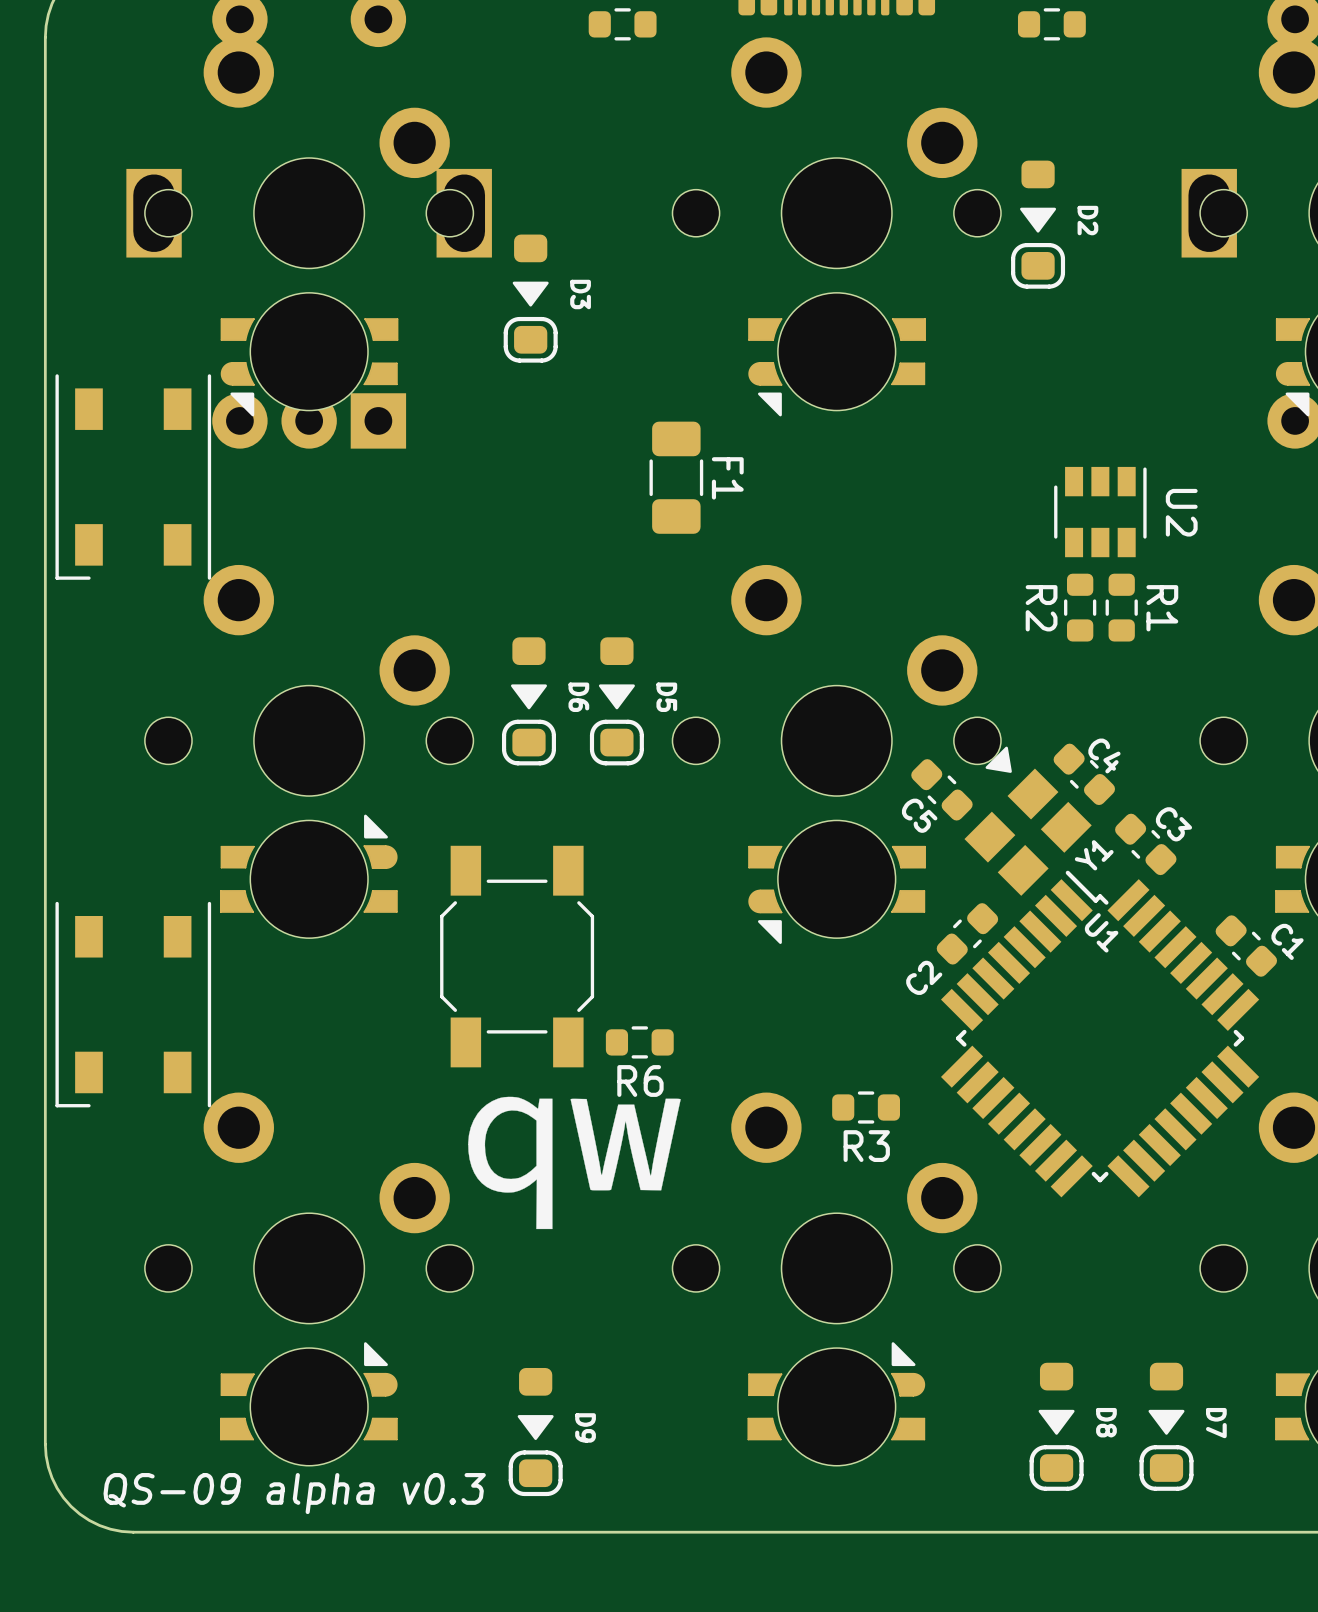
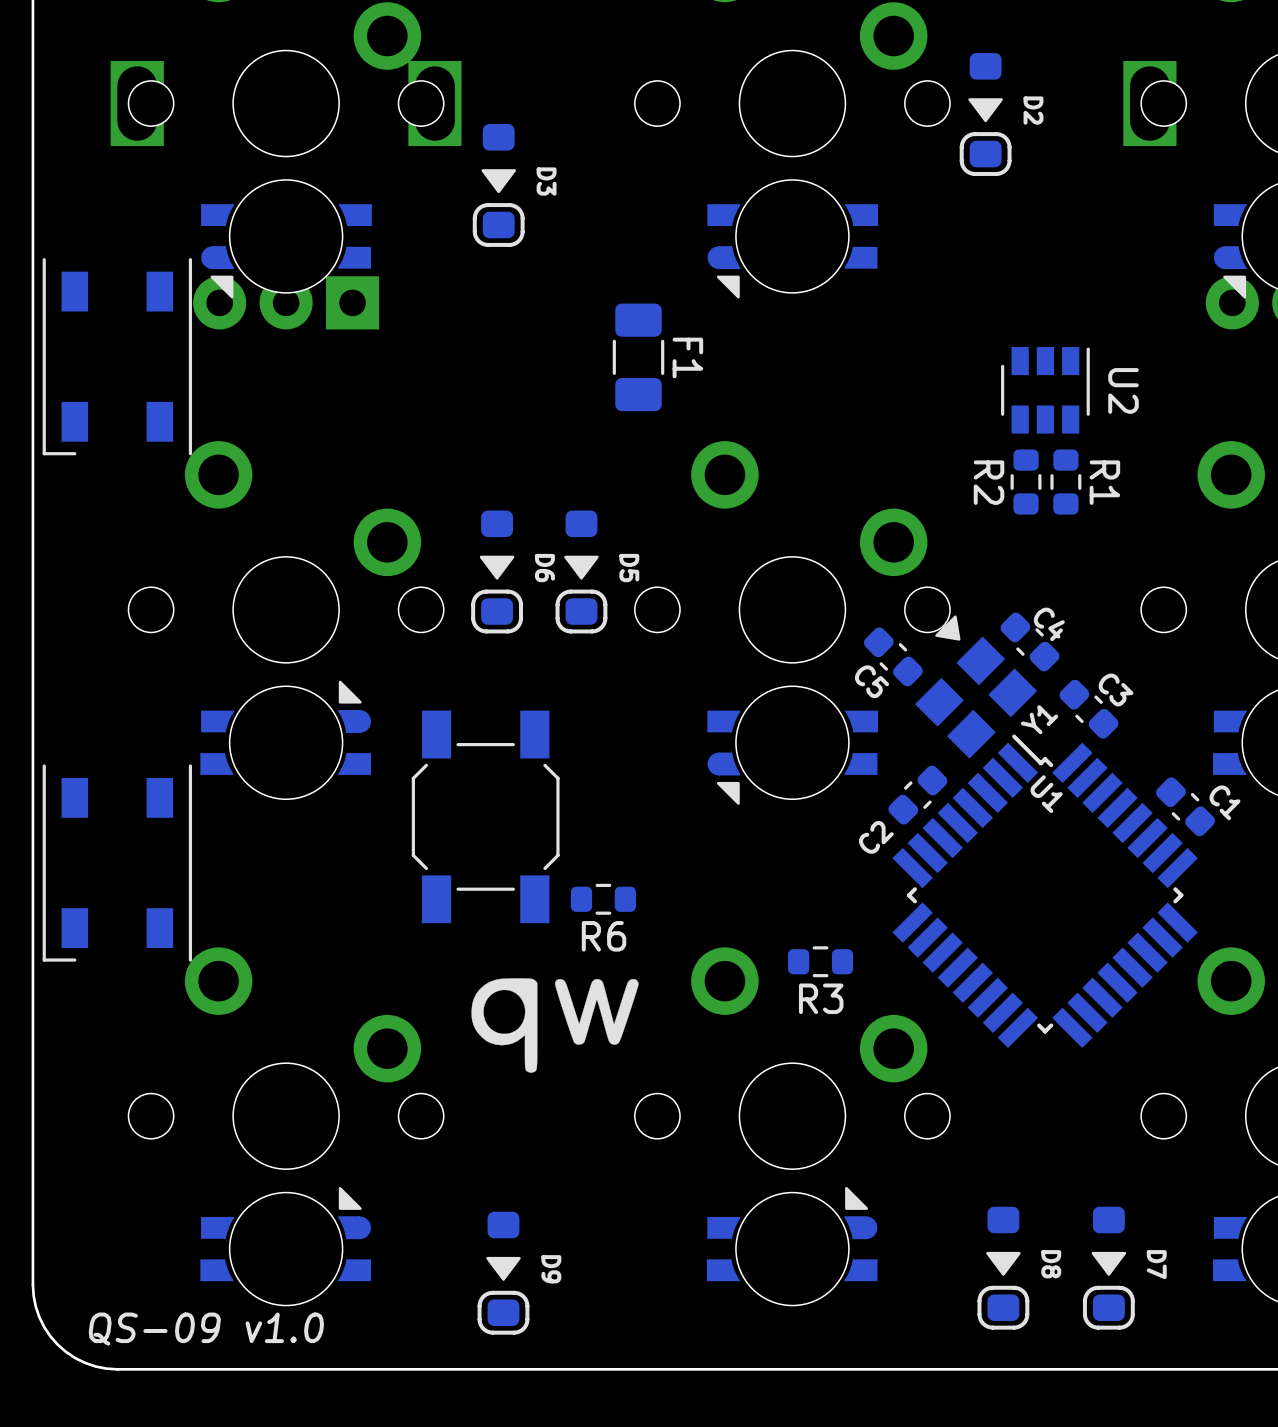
drawing shape: [468, 1096, 681, 1230] -> [471, 978, 639, 1073]
text: QS-09 alpha v0.3 (294, 1493) -> QS-09 v1.0 (206, 1329)

